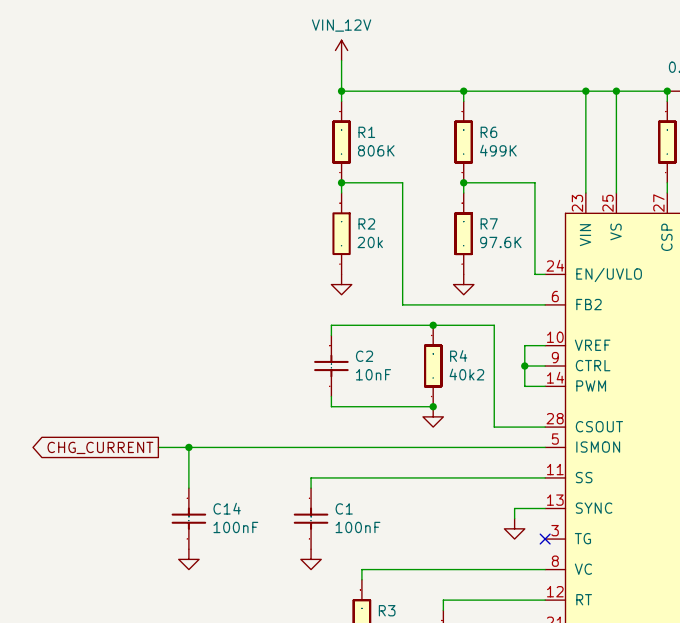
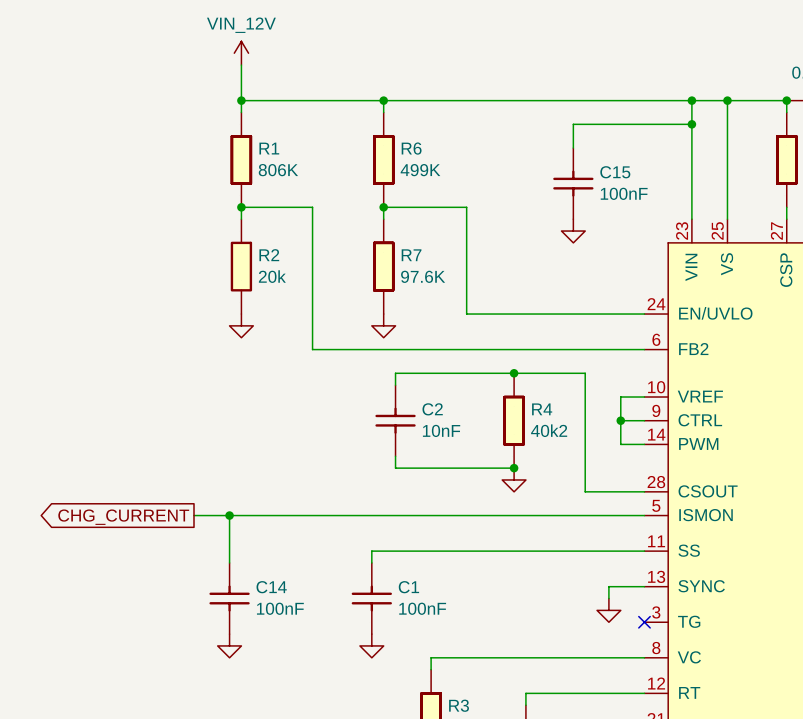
power symbol position: VIN_12V (341, 50) -> VIN_12V (241, 53)
wire: (341, 60) (341, 101) -> (241, 65) (241, 112)
wire: none -> (241, 100) (407, 100)
junction: none -> (241, 100)
junction position: (341, 91) -> (383, 100)
wire: (463, 91) (463, 101) -> (383, 100) (383, 112)
junction: (463, 91) -> none
wire: none -> (691, 124) (573, 124) (573, 148)
junction: none -> (691, 124)
R1 position: (341, 142) -> (241, 159)
R6 position: (463, 142) -> (383, 159)
C15: none -> (573, 183)
junction: none -> (241, 207)
wire: (341, 182) (341, 192) -> (407, 207) (383, 207) (383, 219)
junction position: (341, 182) -> (383, 207)
wire: (392, 182) (402, 182) (402, 304) -> (241, 219) (241, 207) (312, 207) (312, 349) (478, 349)
junction: (463, 182) -> none
wire: (463, 192) (463, 182) (534, 182) (534, 274) -> (466, 207) (466, 314) (632, 314)
power symbol: none -> (573, 231)
R2 position: (341, 233) -> (241, 266)
R7 position: (463, 233) -> (383, 266)
power symbol: none -> (241, 325)
power symbol position: (341, 284) -> (383, 325)
power symbol: (463, 284) -> none

